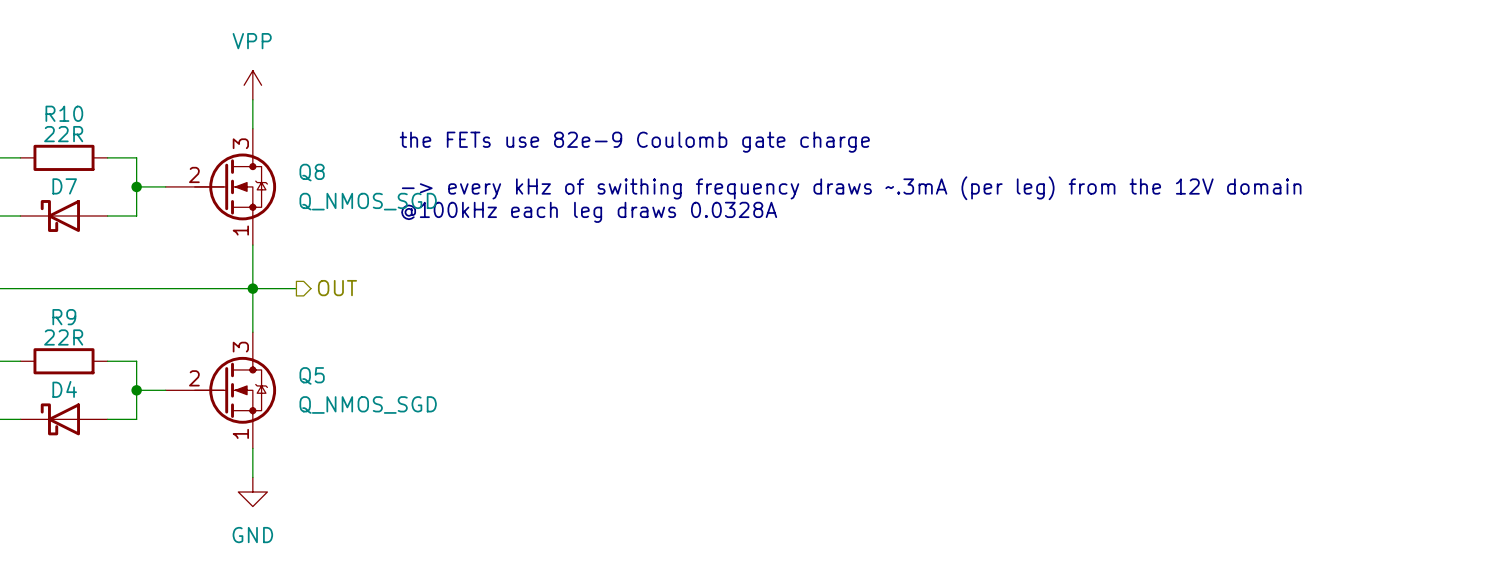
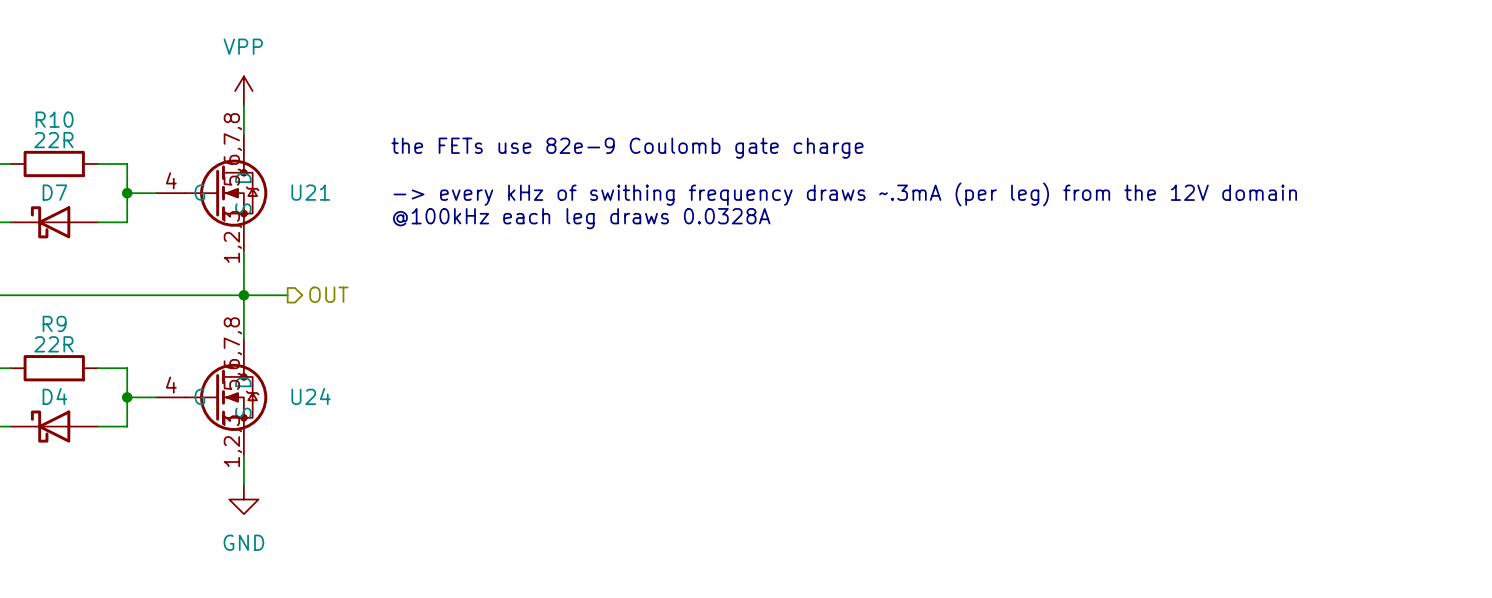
Q8: Q_NMOS_SGD (220, 186) -> none
U21: none -> (211, 193)
Q5: Q_NMOS_SGD (220, 390) -> none
U24: none -> (211, 397)

